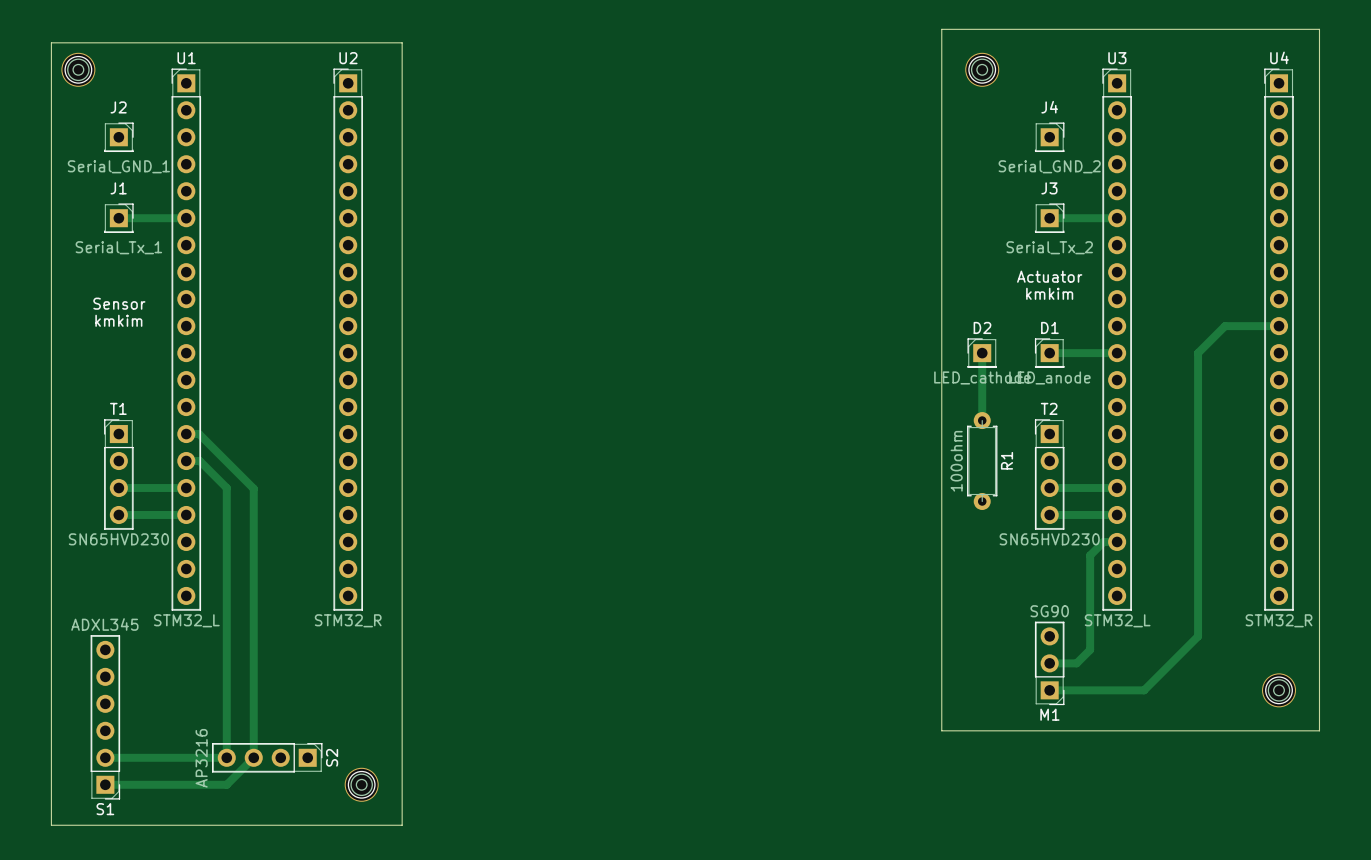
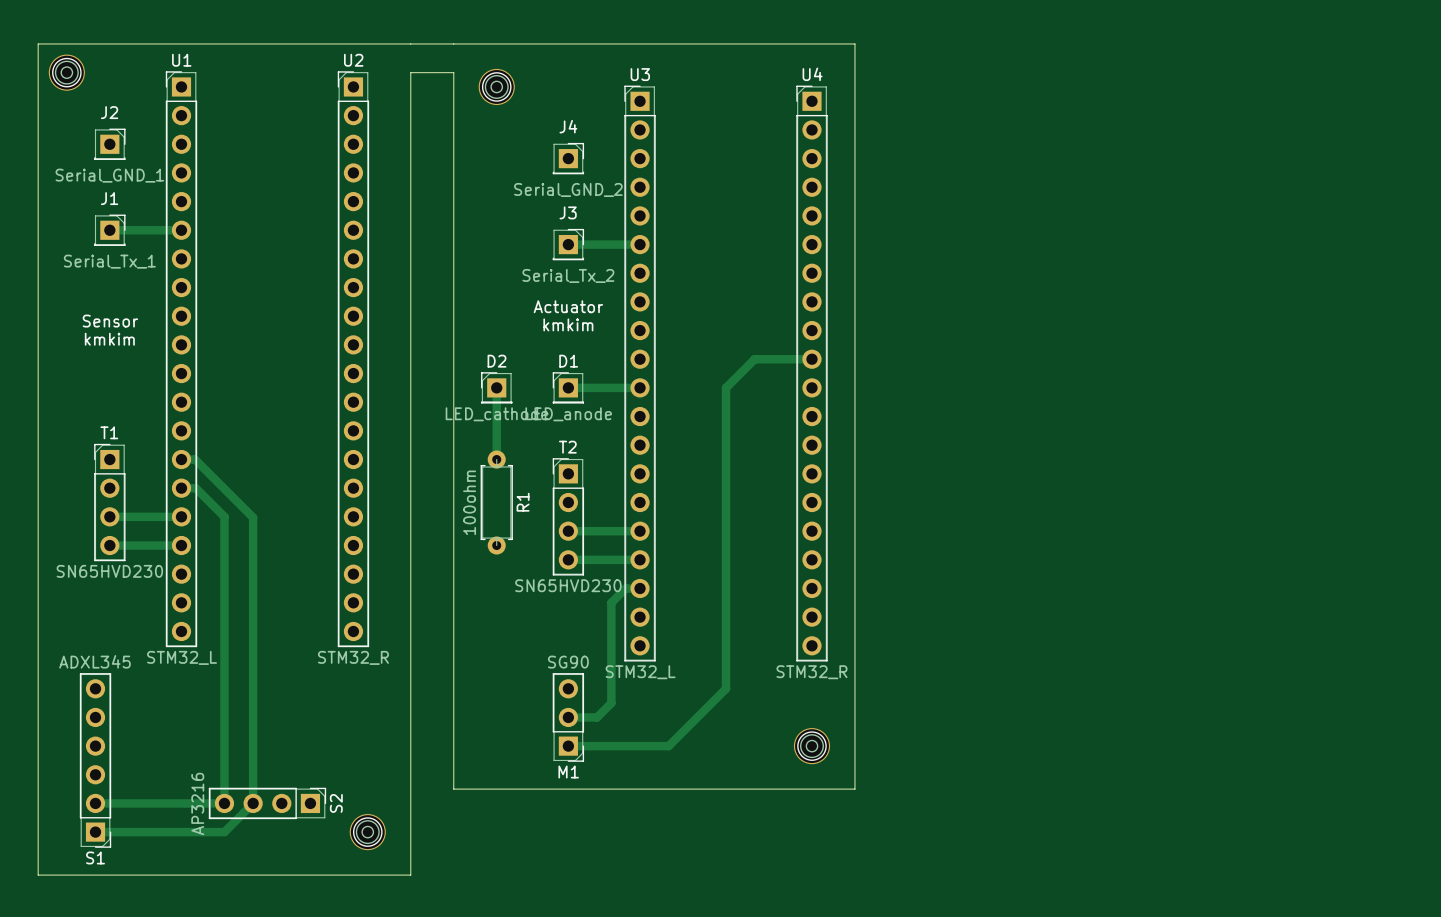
board edge: (941, 29) (941, 730) (1319, 730) (1319, 29) (941, 29) -> none
board edge: (402, 42) (402, 69) -> (410, 43) (854, 43) (854, 789) (453, 789) (453, 72) (410, 72)
part: (982, 69) -> none
part: none -> (496, 86)
J4 position: (1049, 137) -> (568, 158)
track: (1049, 218) (1117, 218) -> none
J3 position: (1049, 218) -> (568, 244)
track: none -> (568, 244) (640, 244)
text: Actuator (1049, 276) -> none
text: none -> Actuator (568, 306)
text: kmkim (1049, 293) -> none
text: none -> kmkim (568, 324)
track: (1279, 326) (1225, 326) (1198, 353) (1198, 636) (1144, 690) (1049, 690) -> none
track: none -> (811, 359) (754, 359) (726, 387) (726, 688) (668, 746) (568, 746)
U3 position: (1117, 339) -> (640, 373)
U4 position: (1279, 339) -> (811, 373)
track: (982, 353) (982, 420) -> none
D2 position: (982, 353) -> (496, 387)
track: (1049, 353) (1117, 353) -> none
D1 position: (1049, 353) -> (568, 387)
track: none -> (496, 387) (496, 459)
track: none -> (568, 387) (640, 387)
R1 position: (982, 461) -> (496, 502)
T2 position: (1049, 474) -> (568, 516)
track: (1049, 488) (1117, 488) -> none
track: none -> (568, 531) (640, 531)
track: (1049, 514) (1117, 514) -> none
track: none -> (568, 559) (640, 559)
track: (1117, 541) (1103, 541) (1090, 555) (1090, 649) (1076, 663) (1049, 663) -> none
track: none -> (640, 588) (625, 588) (611, 602) (611, 703) (597, 717) (568, 717)
M1 position: (1049, 663) -> (568, 717)
part: (1279, 690) -> none
part: none -> (811, 746)

